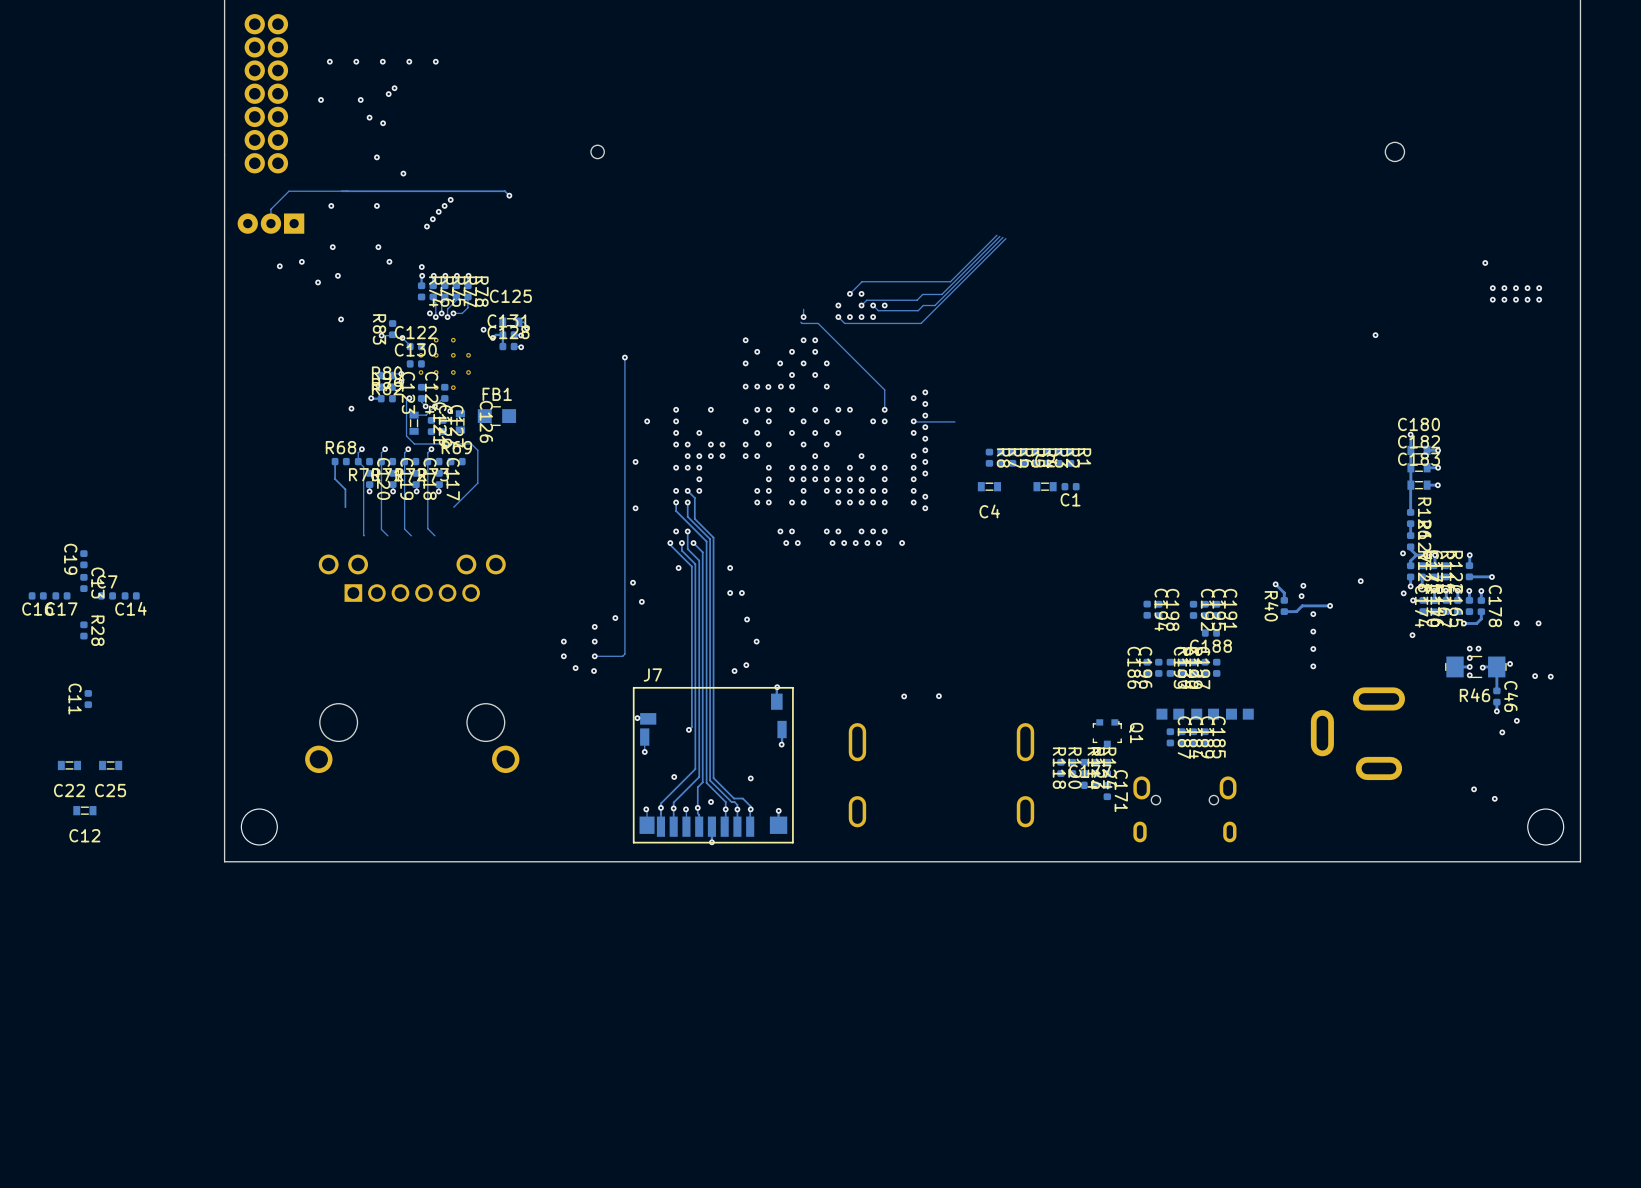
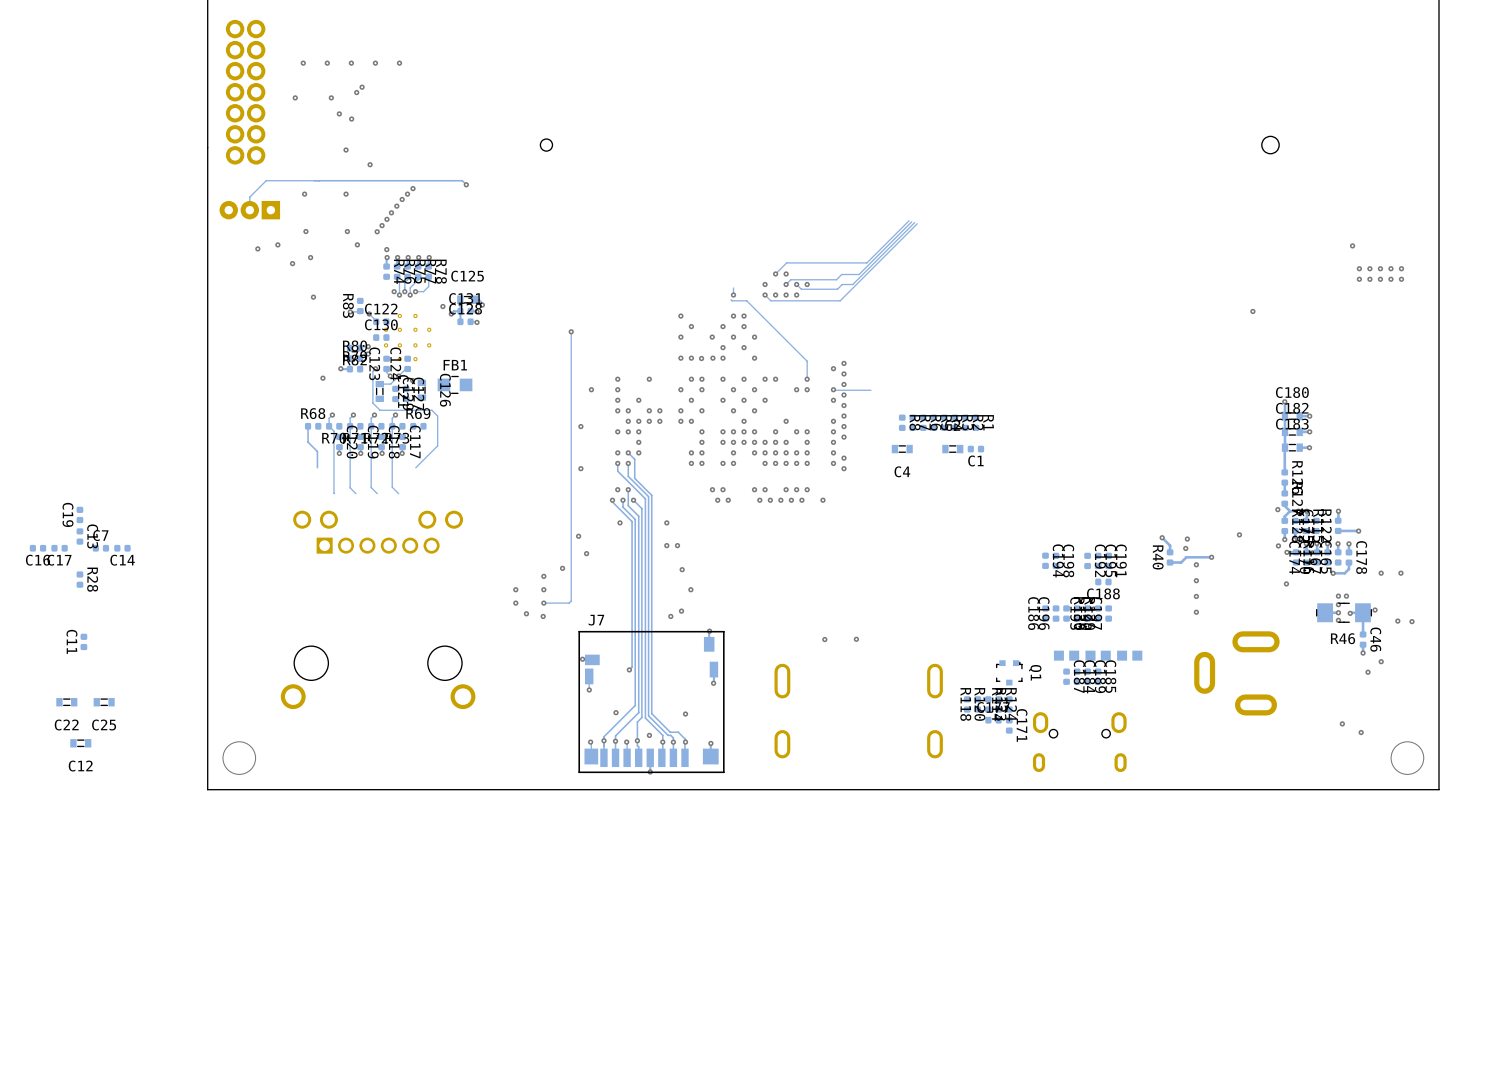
via: none -> (386, 219)
via: none -> (382, 225)
via: none -> (377, 231)

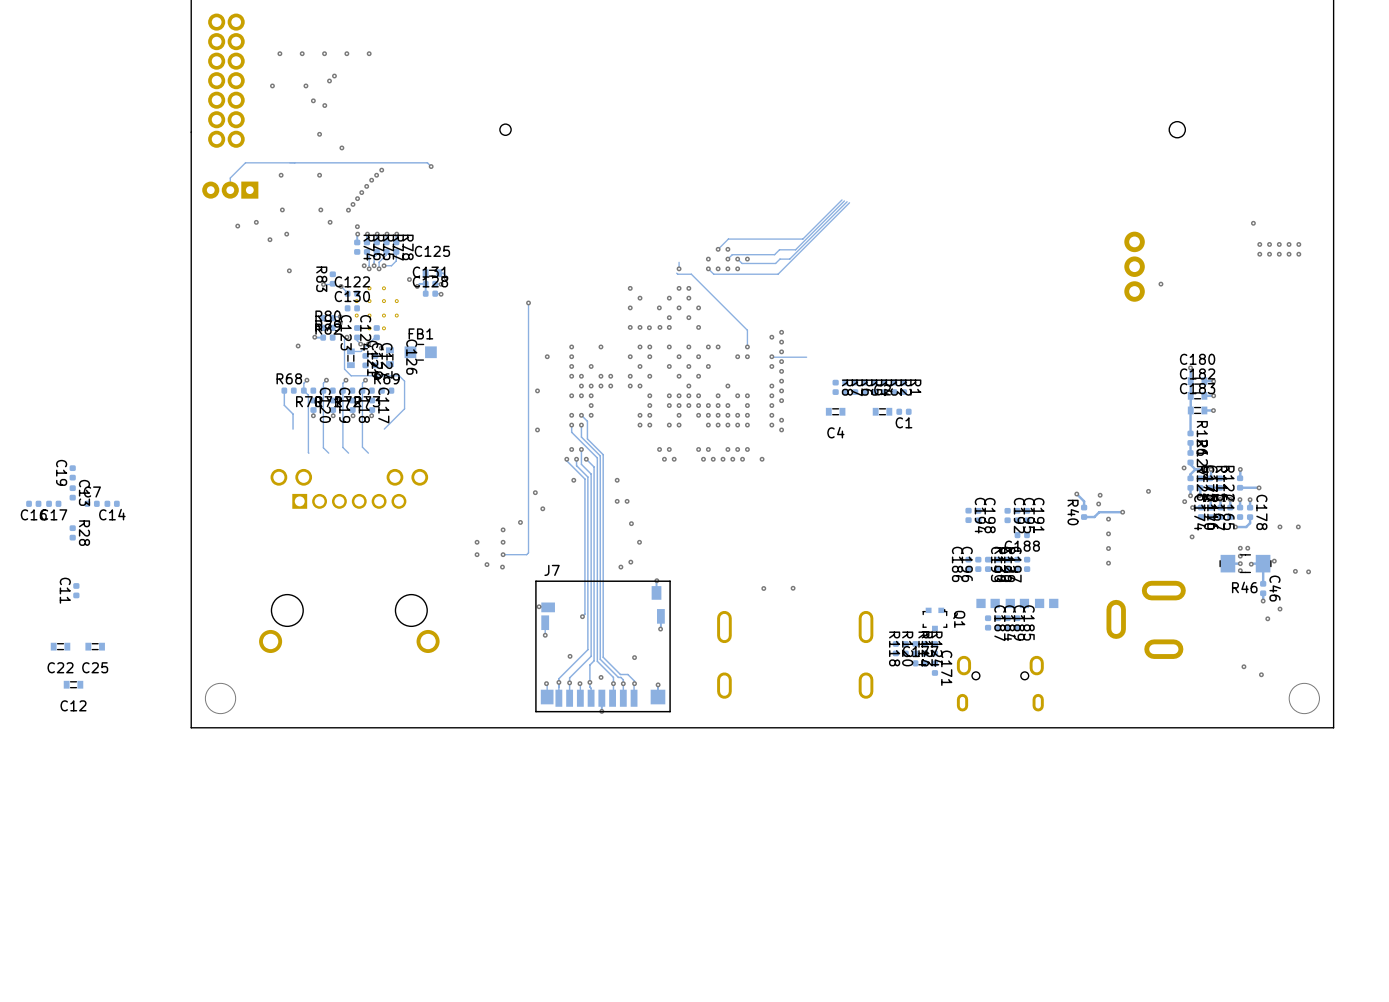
part: none -> (1134, 266)

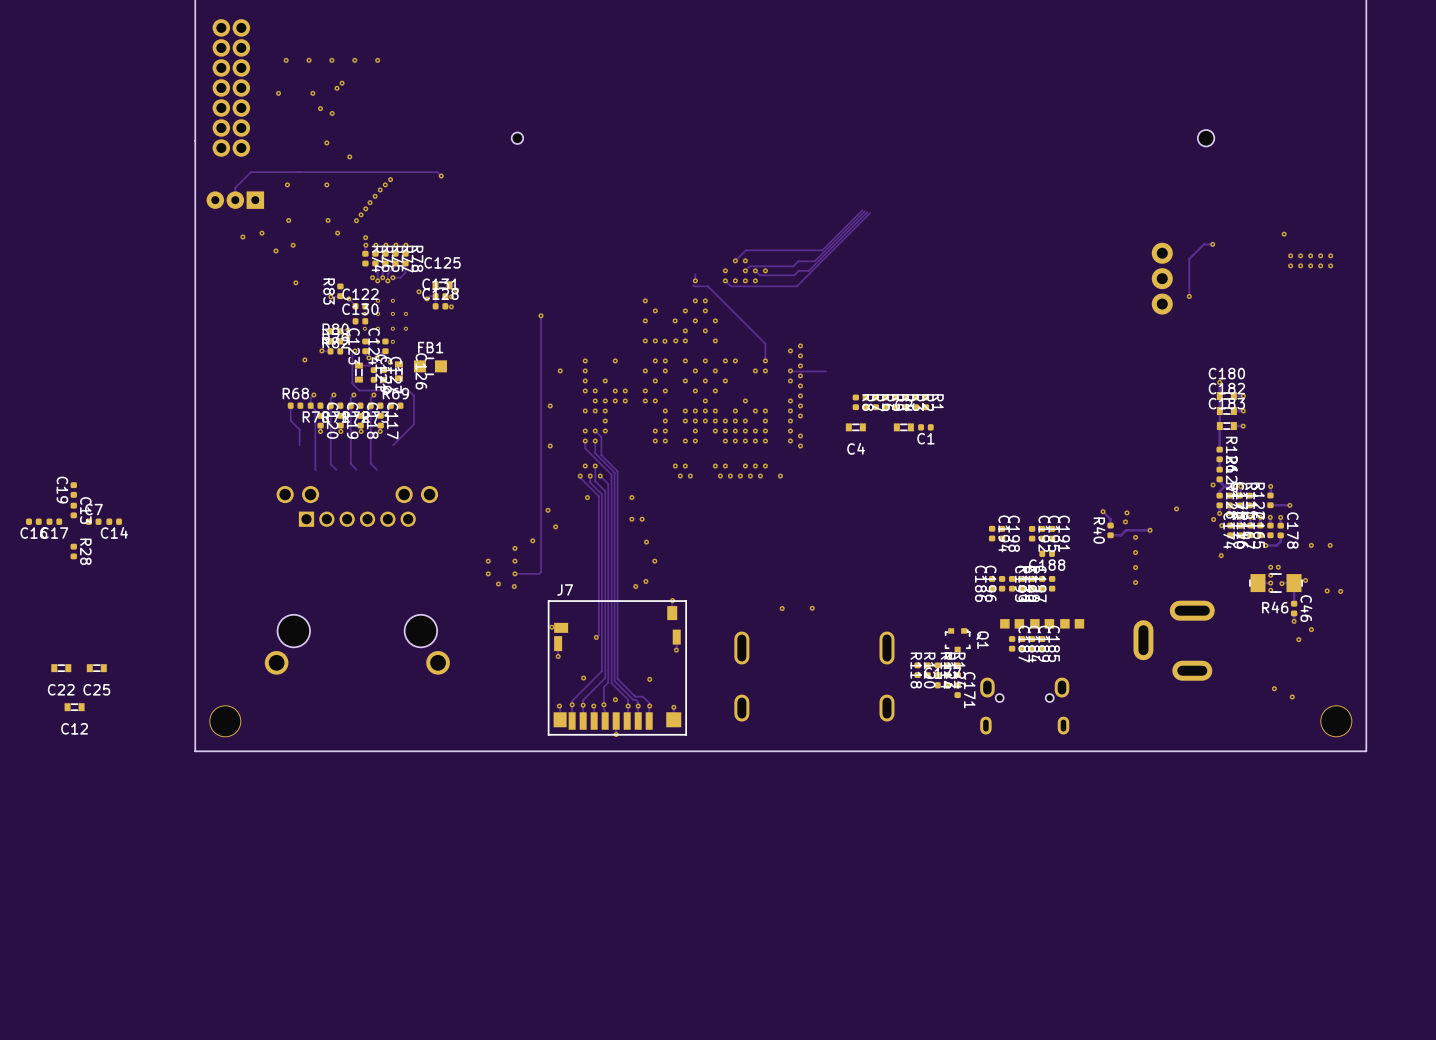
track: none -> (1212, 244) (1203, 244) (1189, 259) (1189, 296)
via: none -> (1212, 244)
C11: (76, 590) -> none

